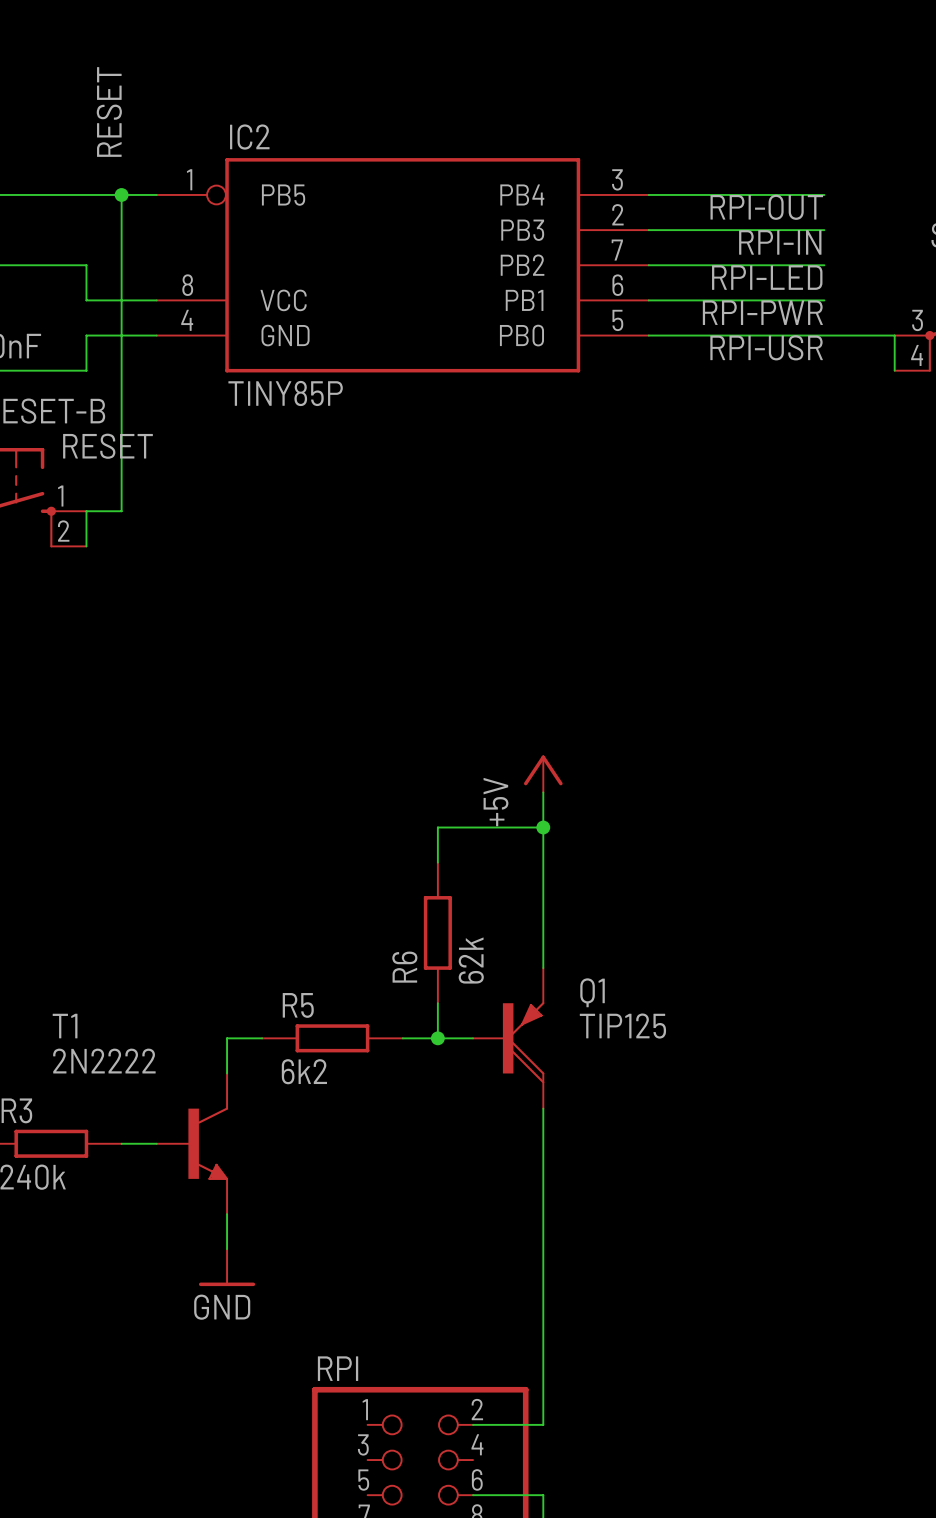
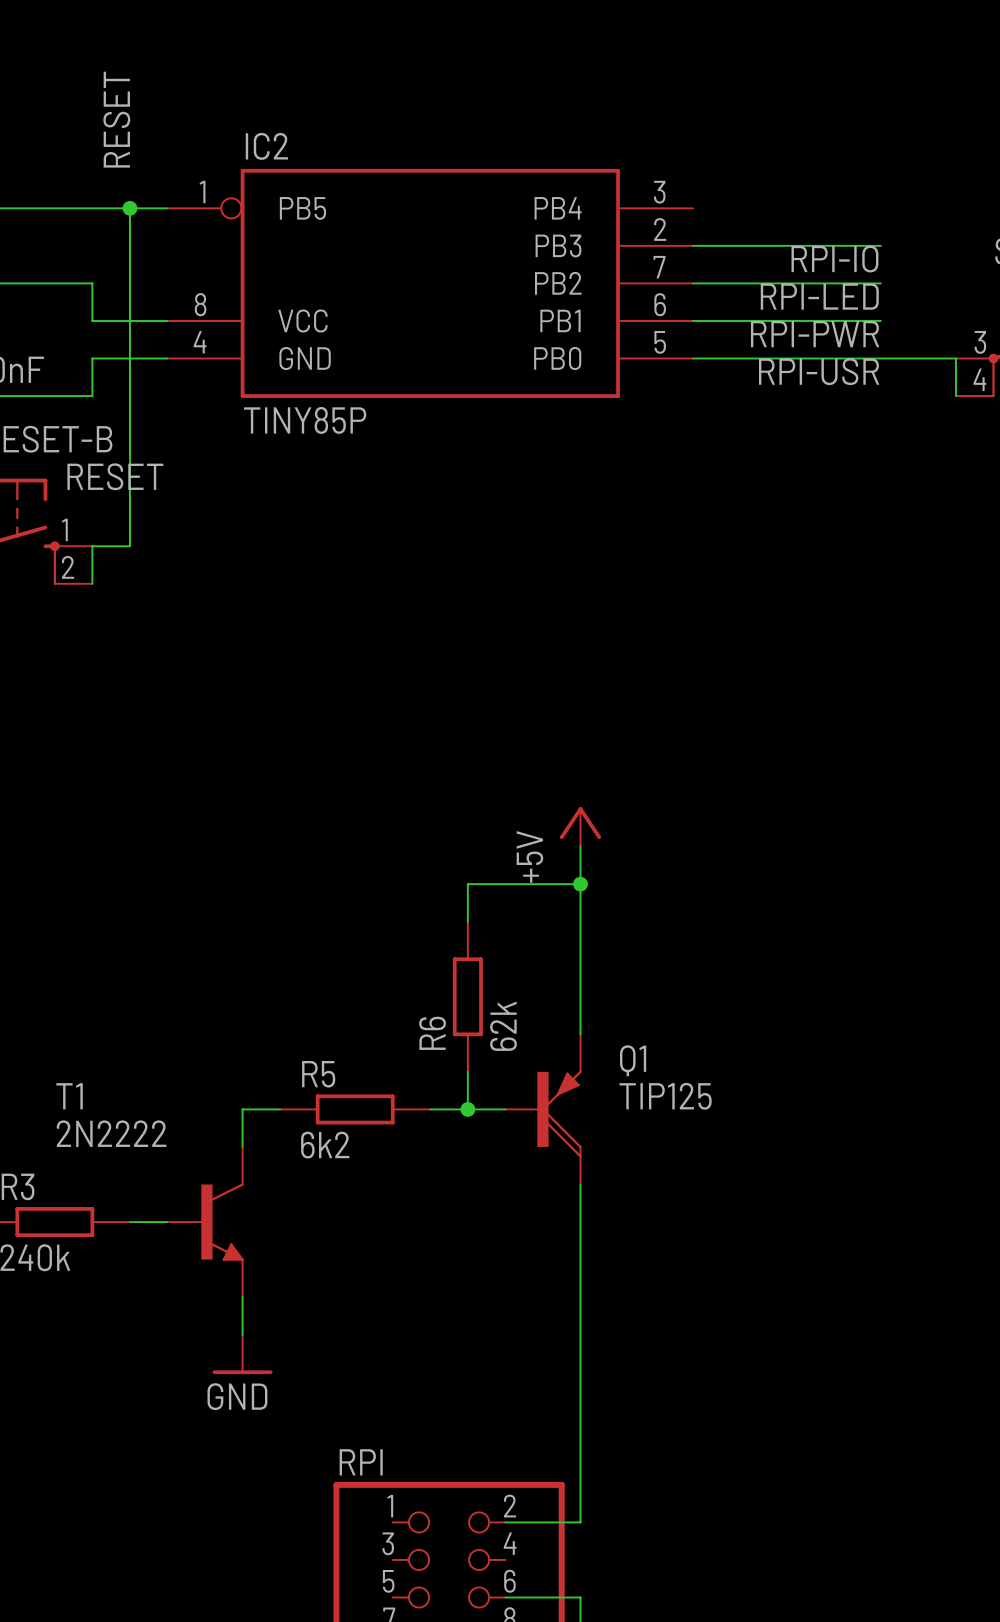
wire: (648, 194) (824, 194) -> none
label: RPI-OUT (766, 207) -> none
label: RPI-IN (780, 242) -> RPI-IO (834, 259)

